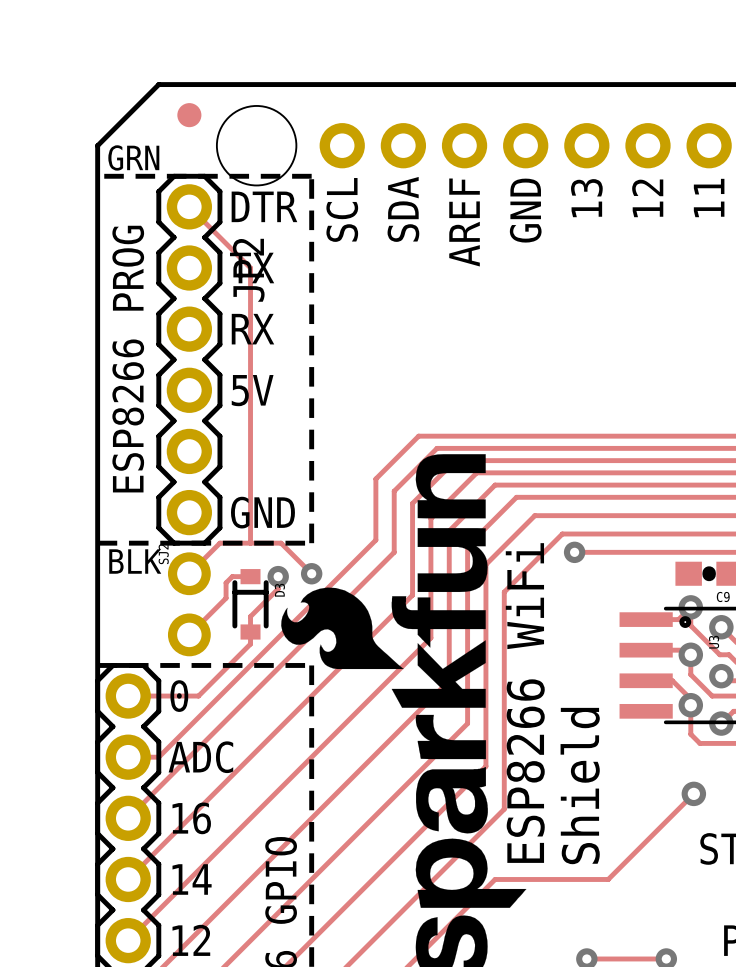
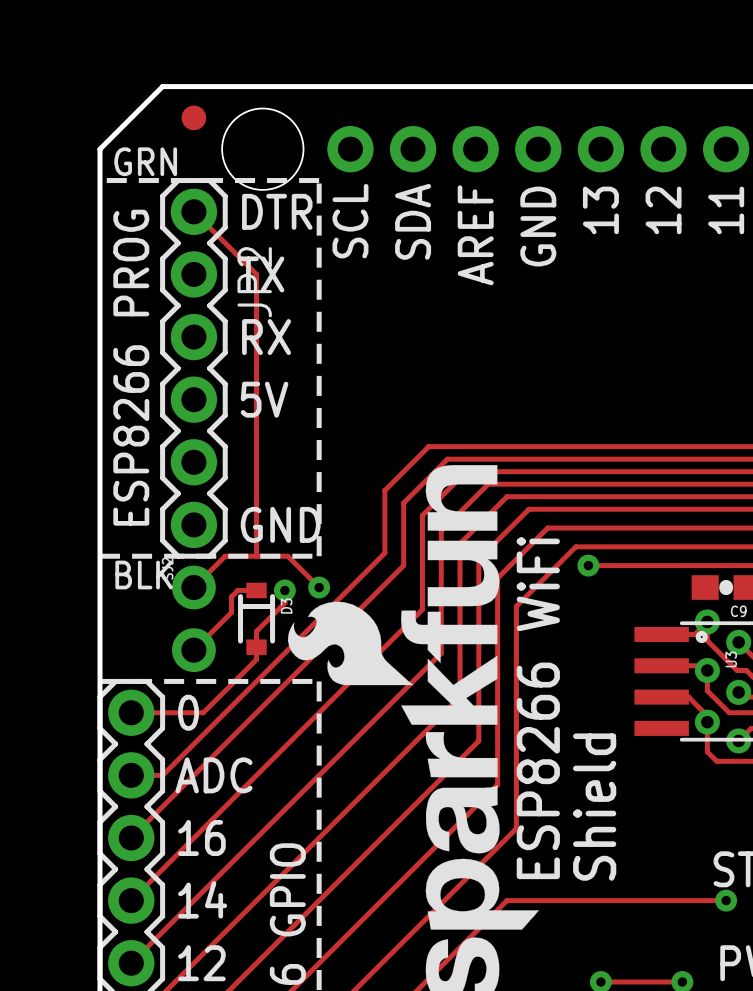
track: (693, 793) (608, 879) -> (726, 900) (622, 900)
via: (693, 793) -> none
via: none -> (726, 900)

